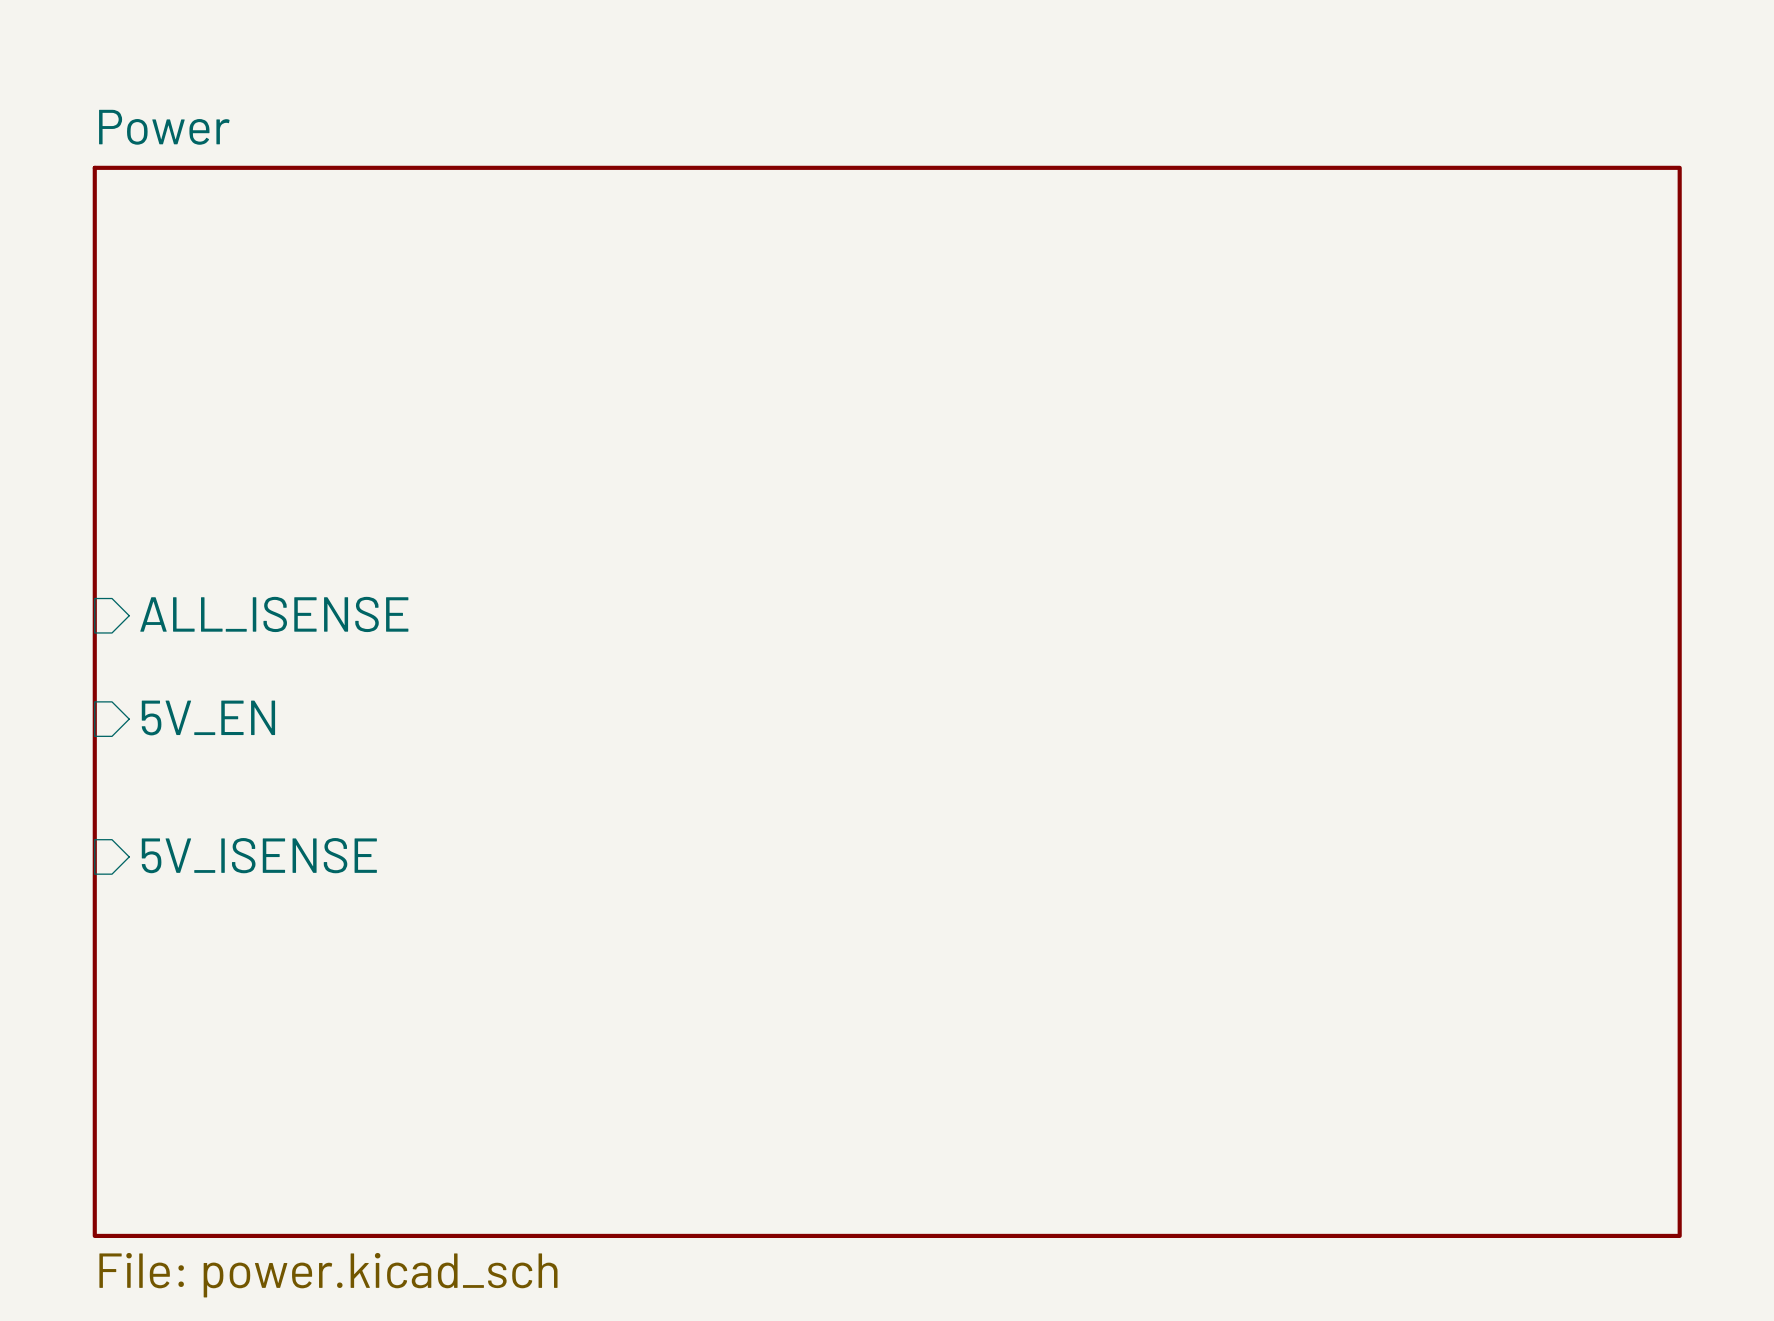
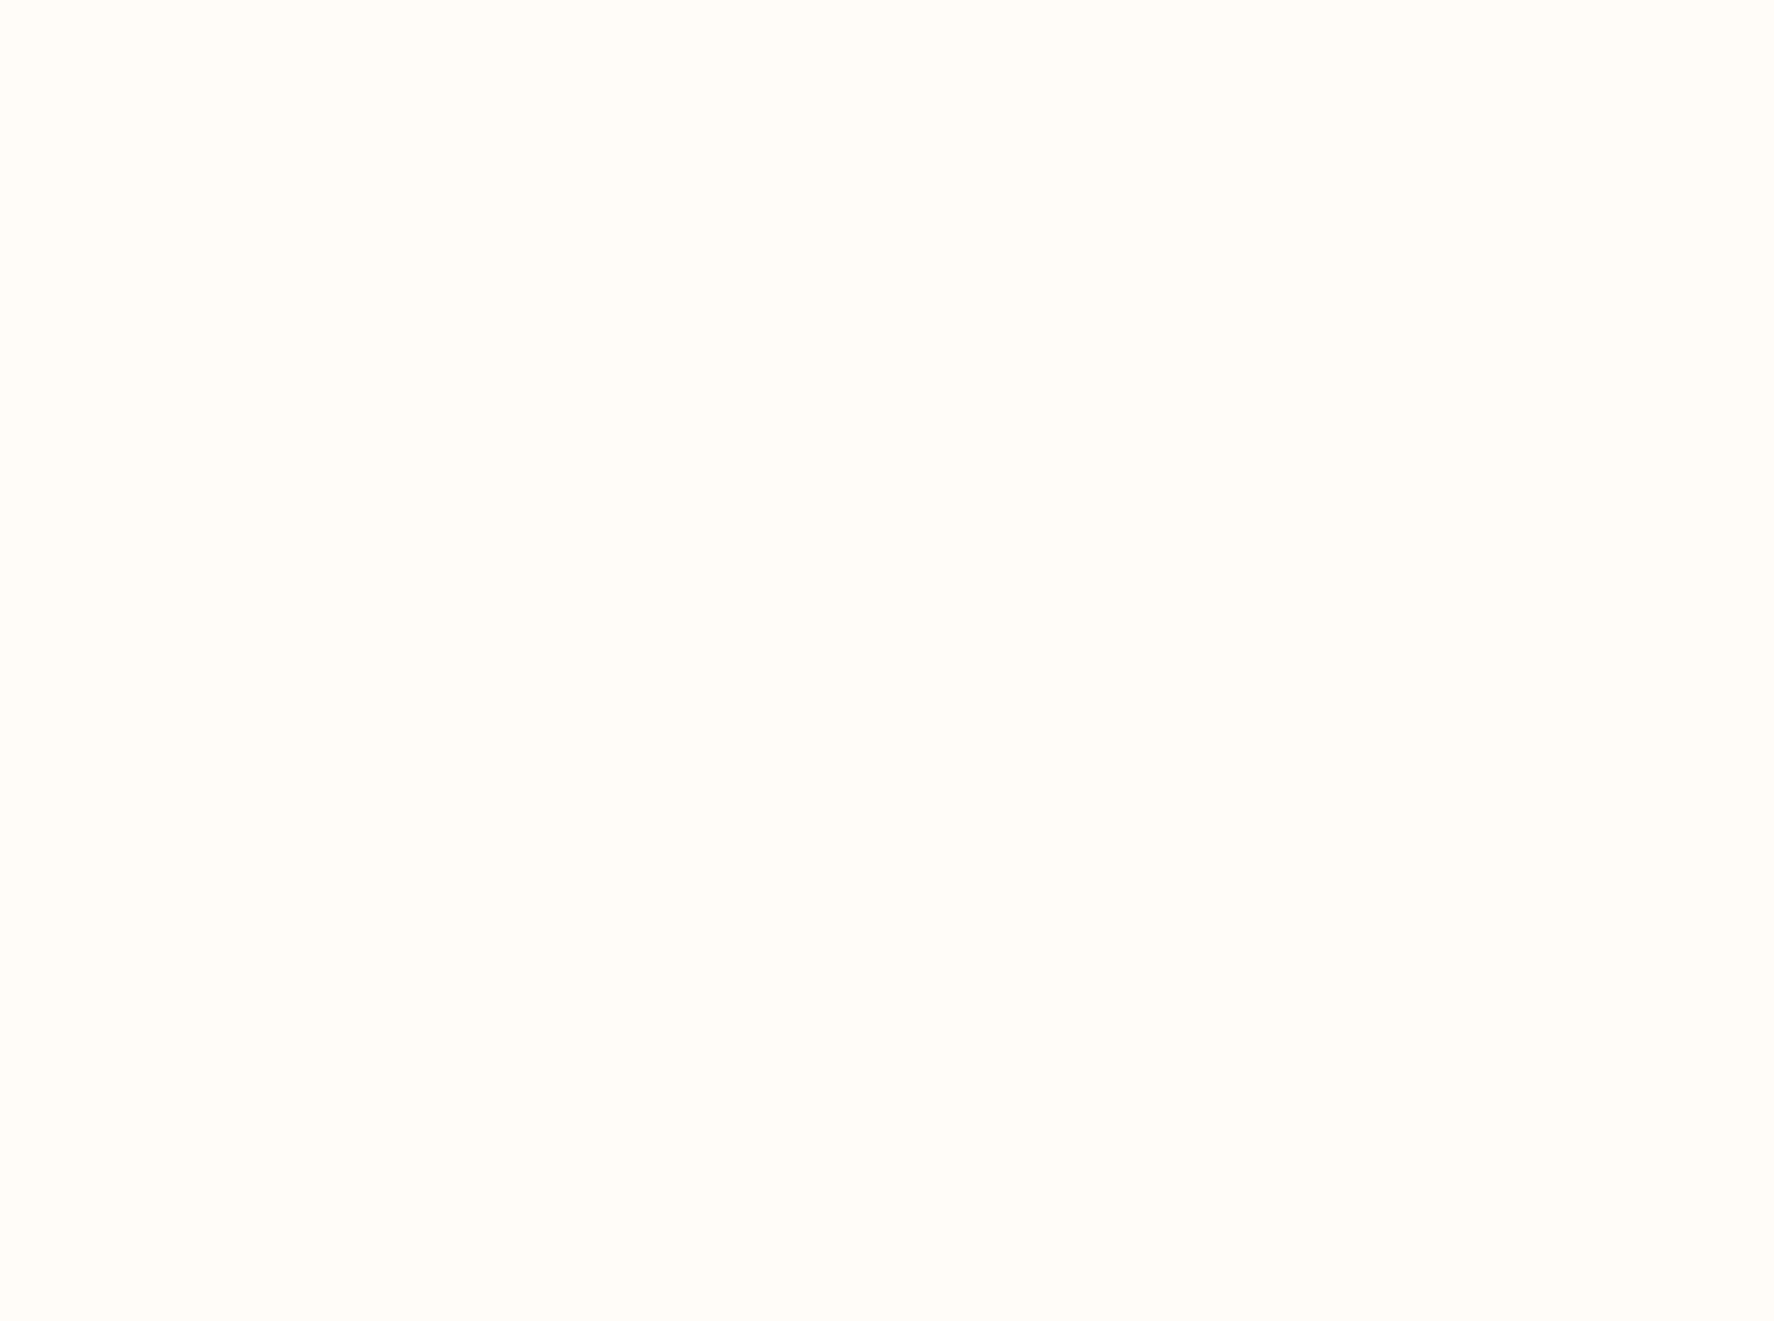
sheet pin: ALL_ISENSE (274, 614) -> none
sheet Power: File: power.kicad_sch (887, 701) -> none
sheet pin: 5V_EN (208, 717) -> none
sheet pin: 5V_ISENSE (259, 855) -> none

